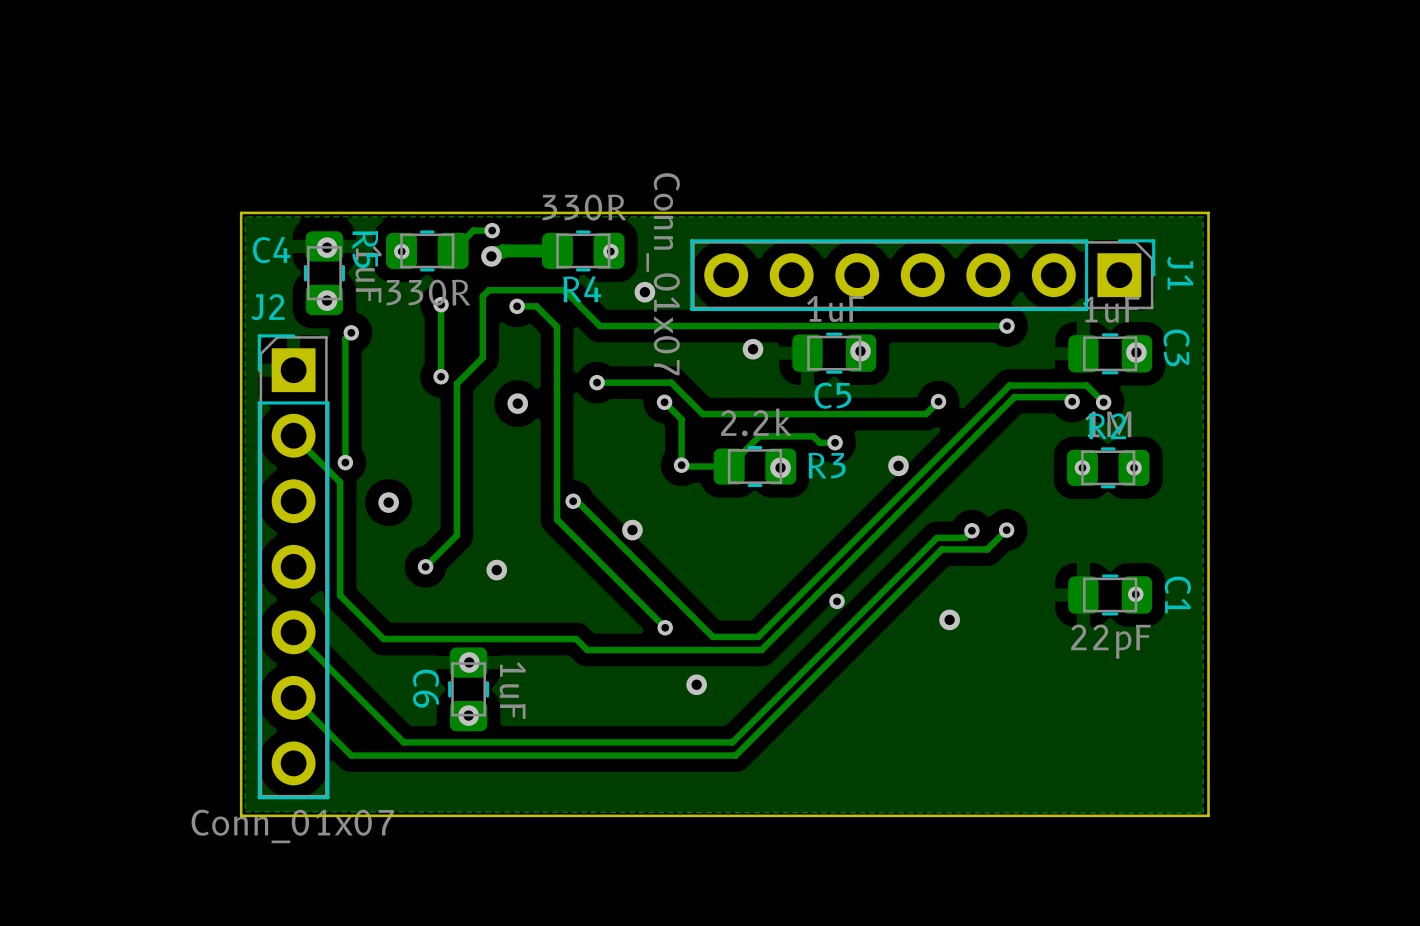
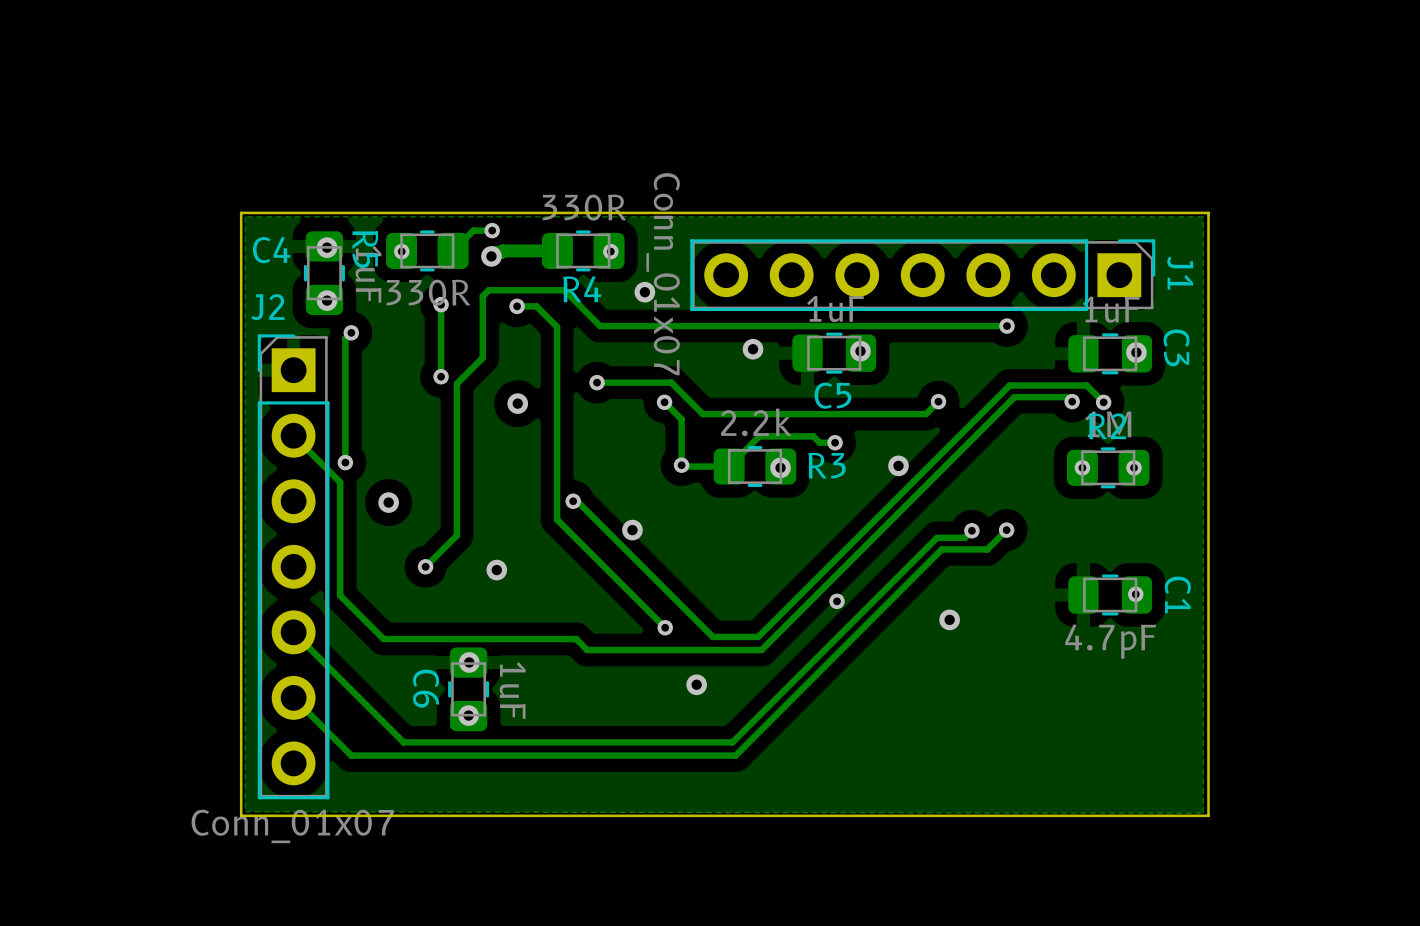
C1 value: 22pF (1111, 641) -> 4.7pF (1110, 641)

